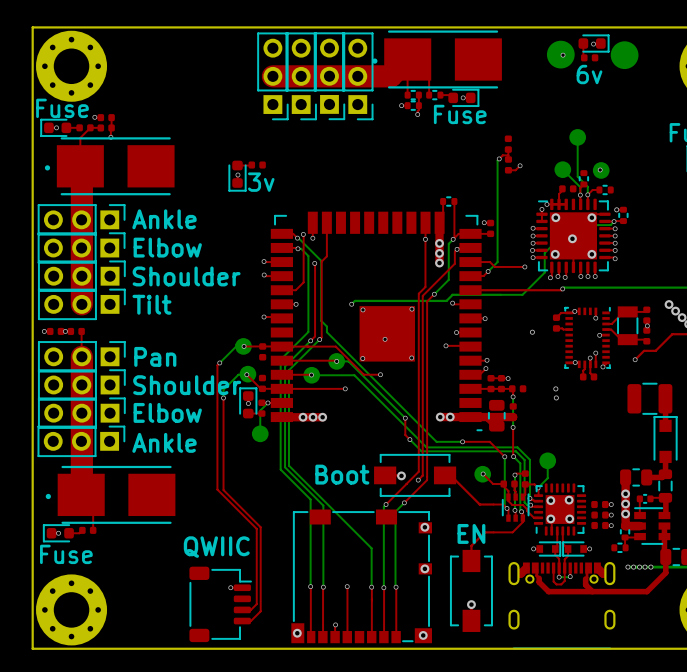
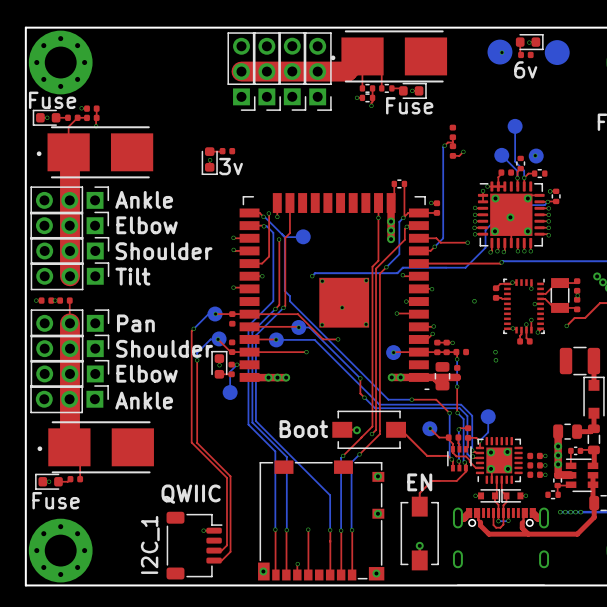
bottom track: none -> (284, 237) (295, 237)
part: none -> (303, 236)
top track: none -> (418, 352) (393, 352)
part: none -> (393, 352)
via: none -> (393, 352)
text: none -> I2C_1 (150, 544)

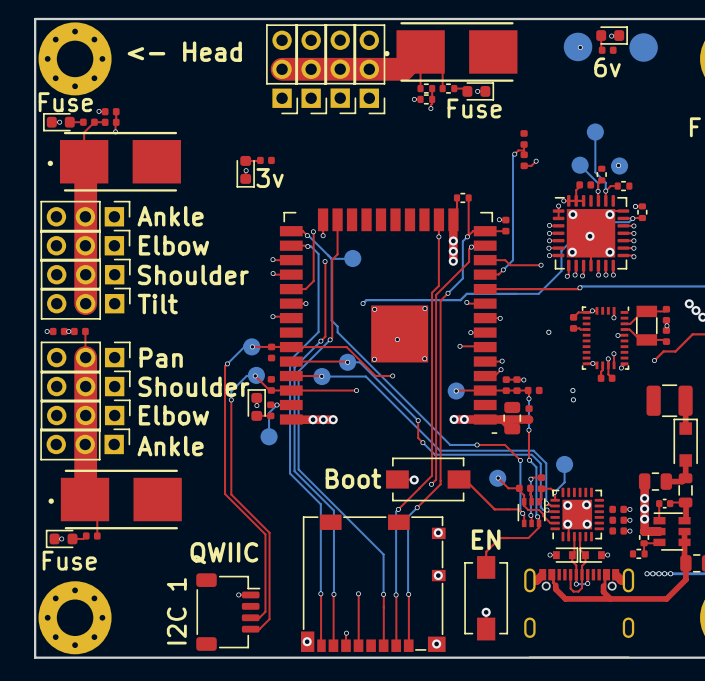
text: none -> <- Head (184, 51)
text: I2C_1 (150, 544) -> I2C 1 (176, 611)

